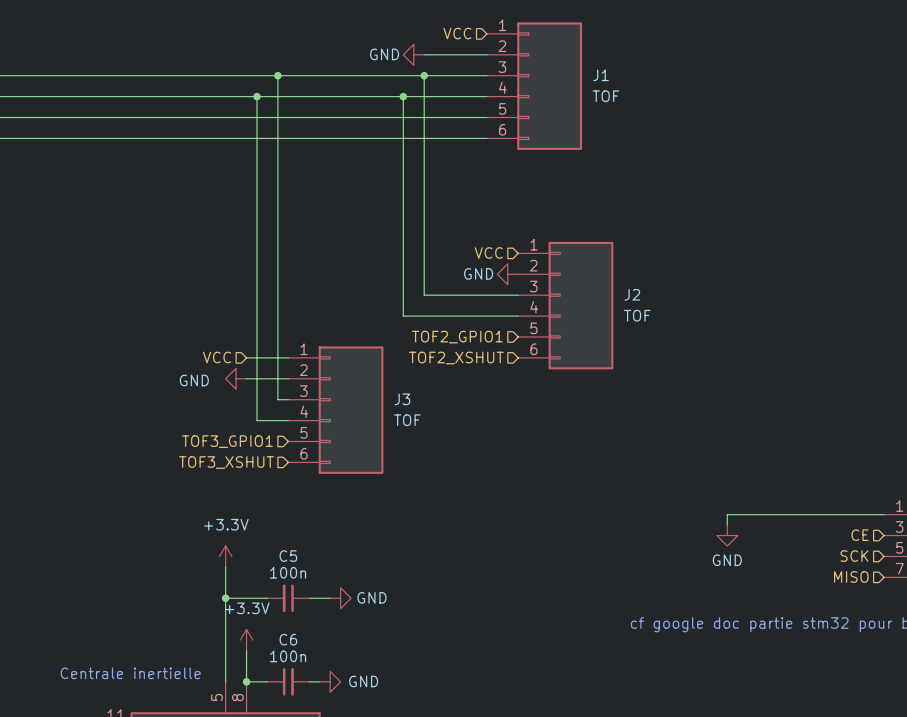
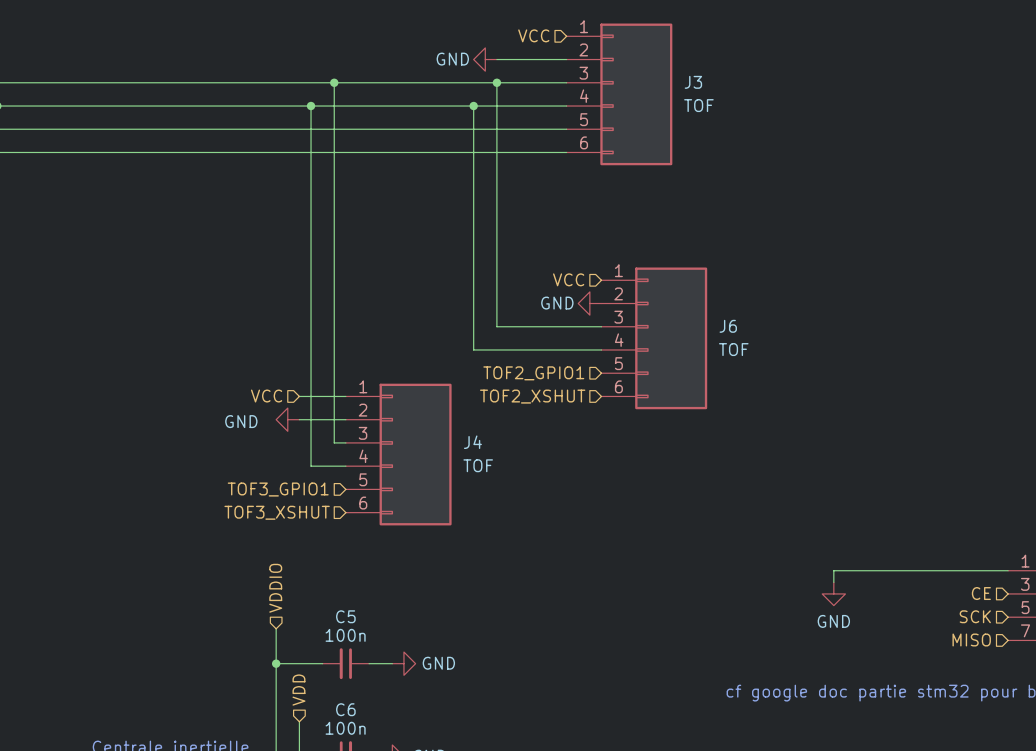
J1 name: J1 (600, 75) -> J3 (693, 82)
J2 name: J2 (632, 294) -> J6 (728, 326)
J3 name: J3 (402, 399) -> J4 (472, 442)
hierarchical label: none -> VDDIO (275, 588)
power symbol: +3.3V (225, 556) -> none
hierarchical label: none -> VDD (298, 690)
power symbol: +3.3V (246, 640) -> none

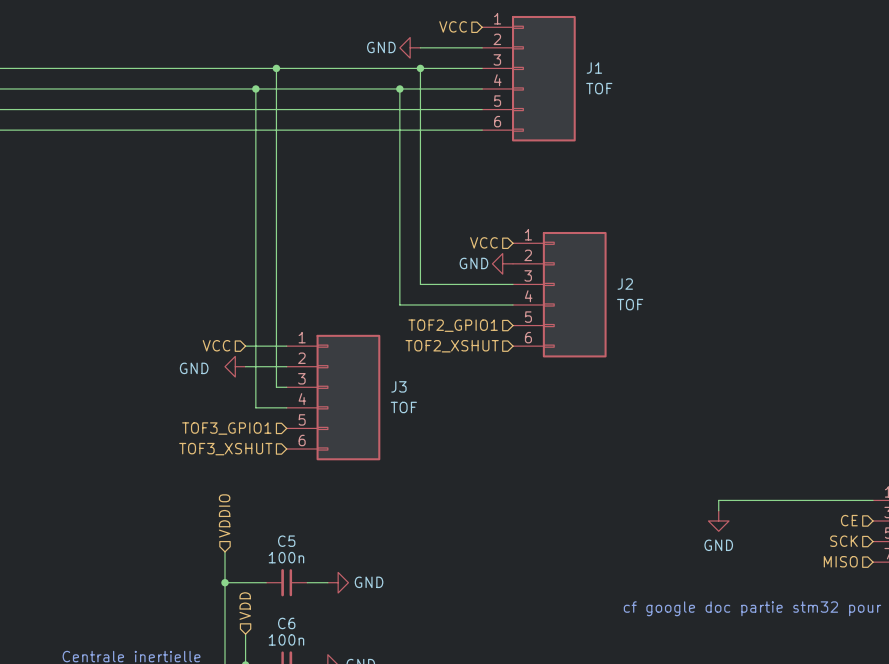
J3 name: J3 (693, 82) -> J1 (594, 68)
J6 name: J6 (728, 326) -> J2 (625, 284)
J4 name: J4 (472, 442) -> J3 (398, 386)

